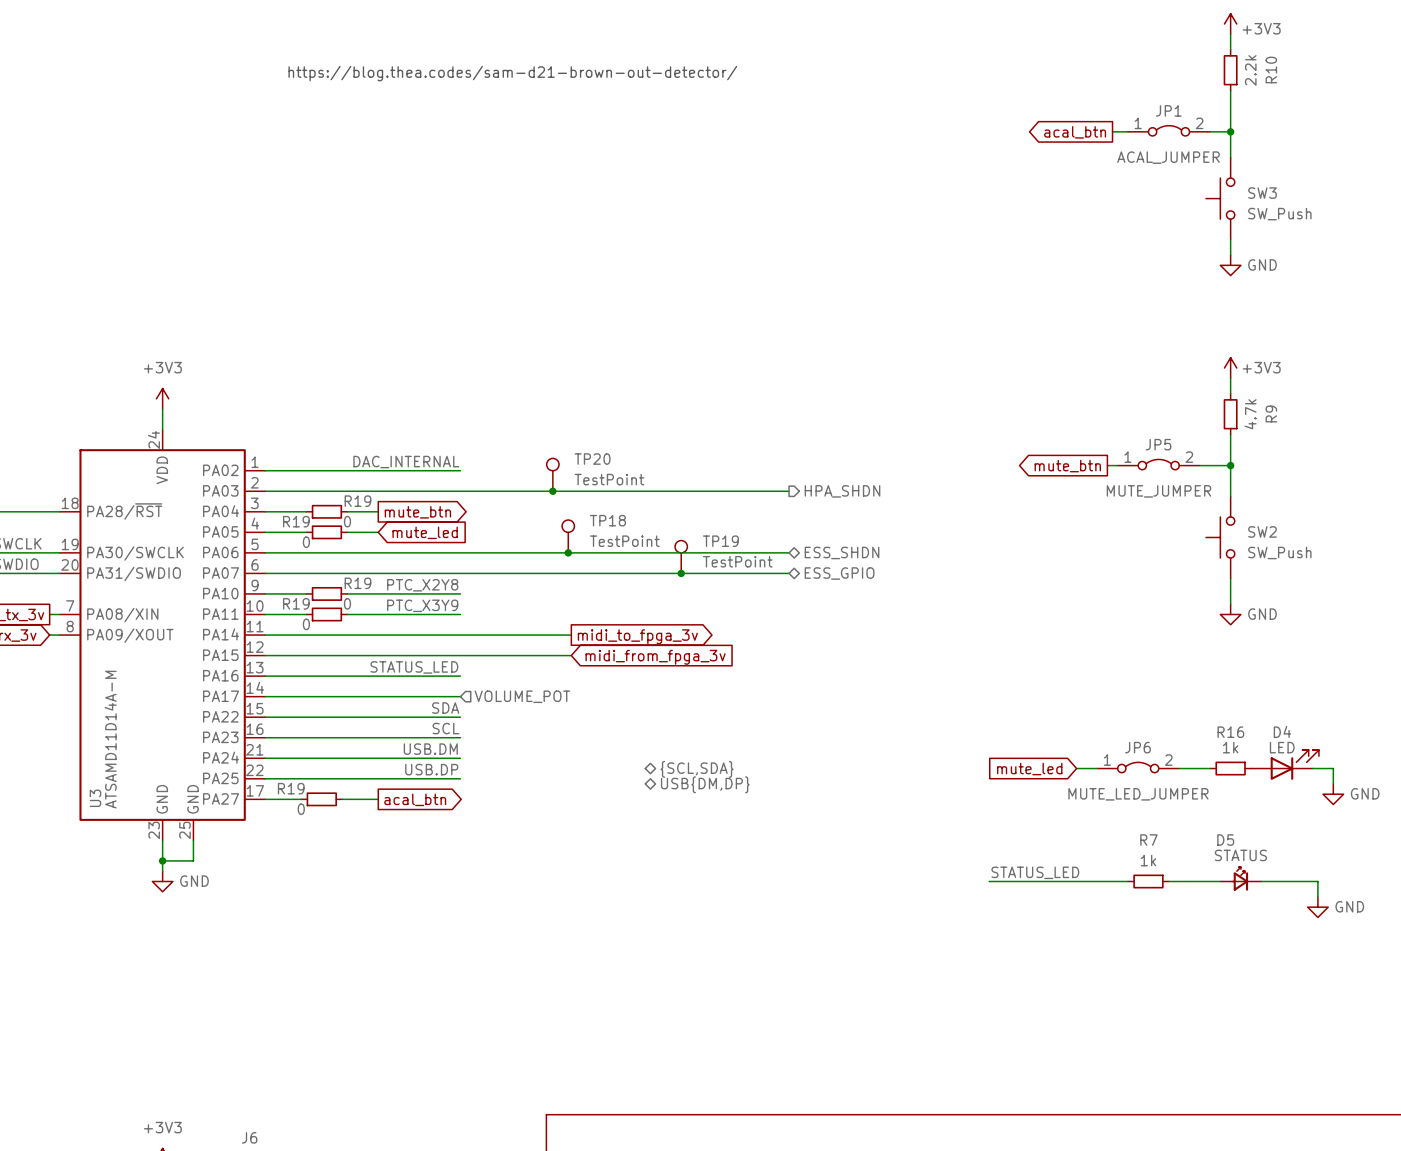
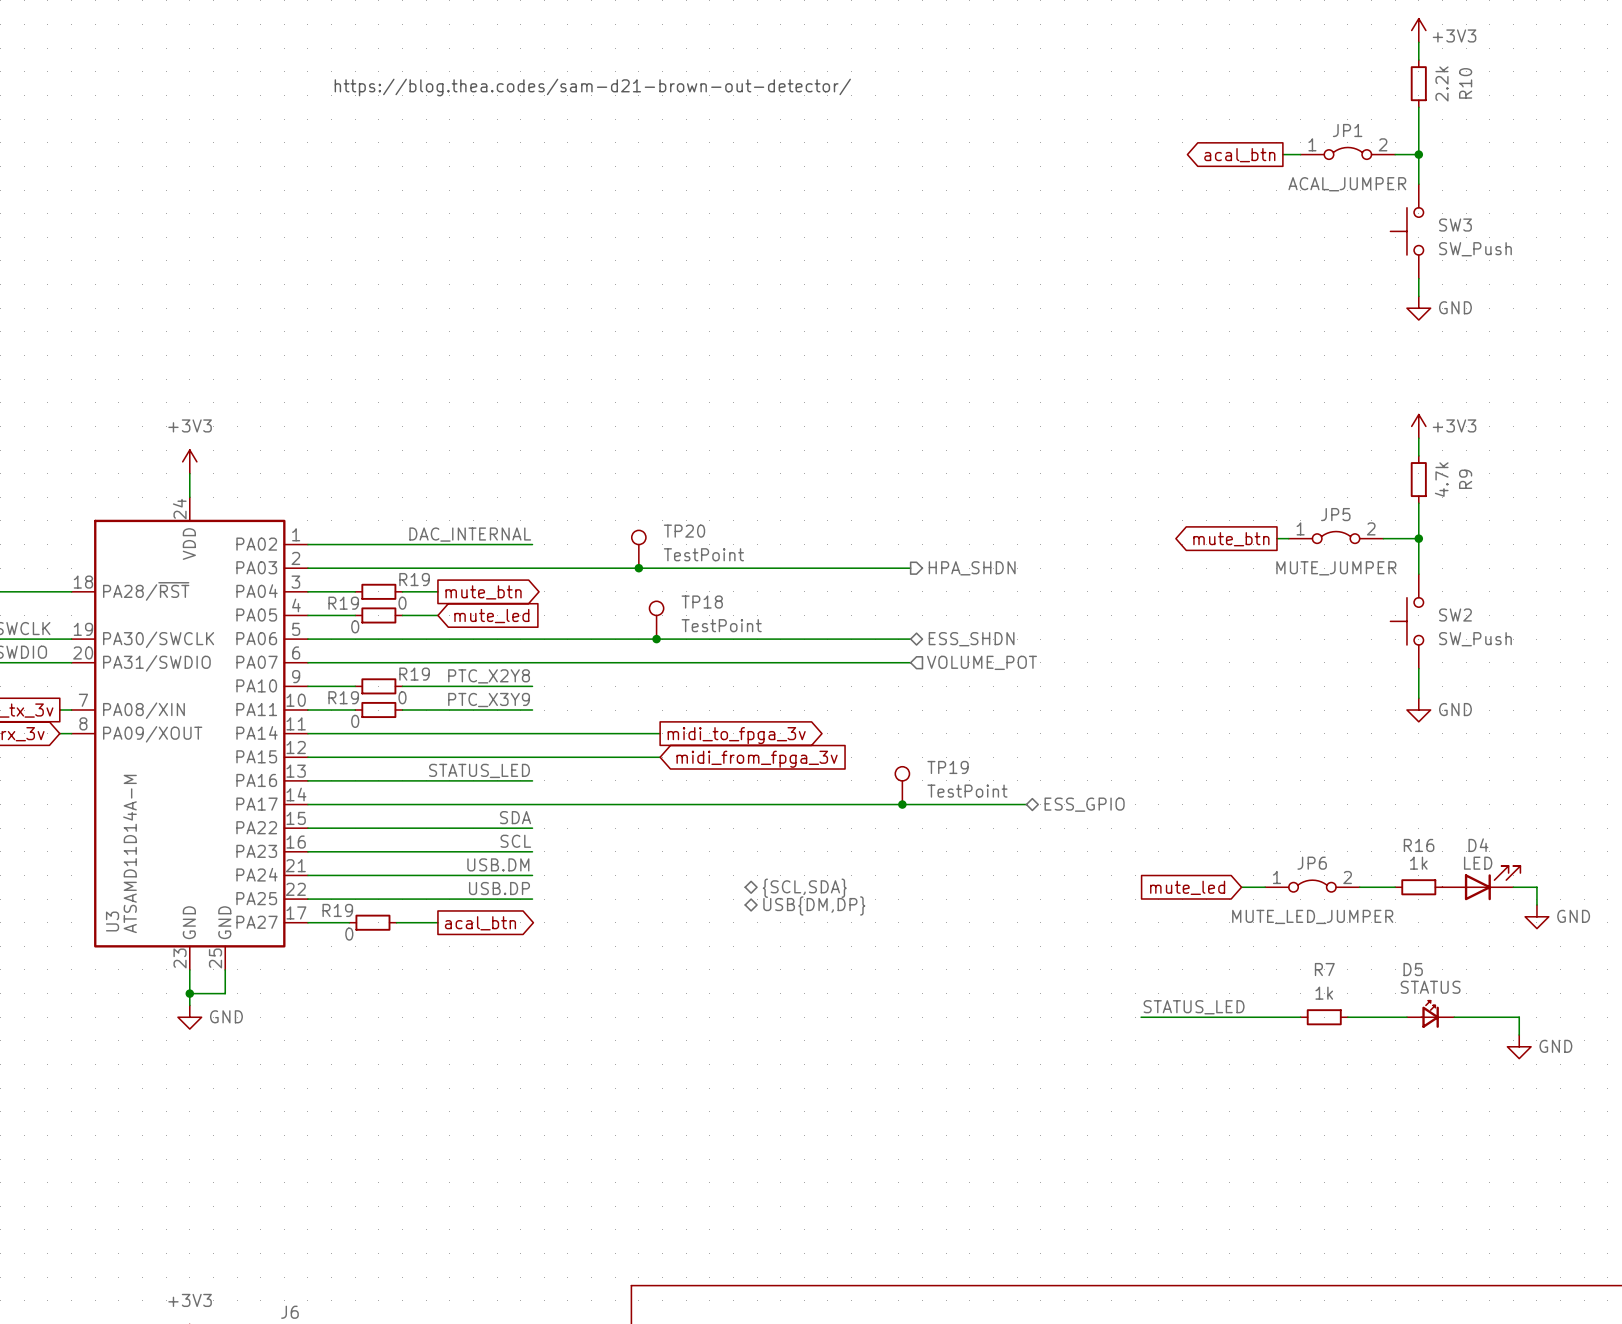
TP19 position: (681, 556) -> (902, 785)
junction: (681, 573) -> none
hierarchical label shape: bidirectional (839, 573) -> input (982, 662)
hierarchical label: ESS_GPIO (839, 573) -> VOLUME_POT (982, 662)
wire: none -> (532, 804) (1026, 804)
hierarchical label: VOLUME_POT (522, 696) -> none
junction: none -> (902, 804)
hierarchical label: none -> ESS_GPIO (1084, 804)

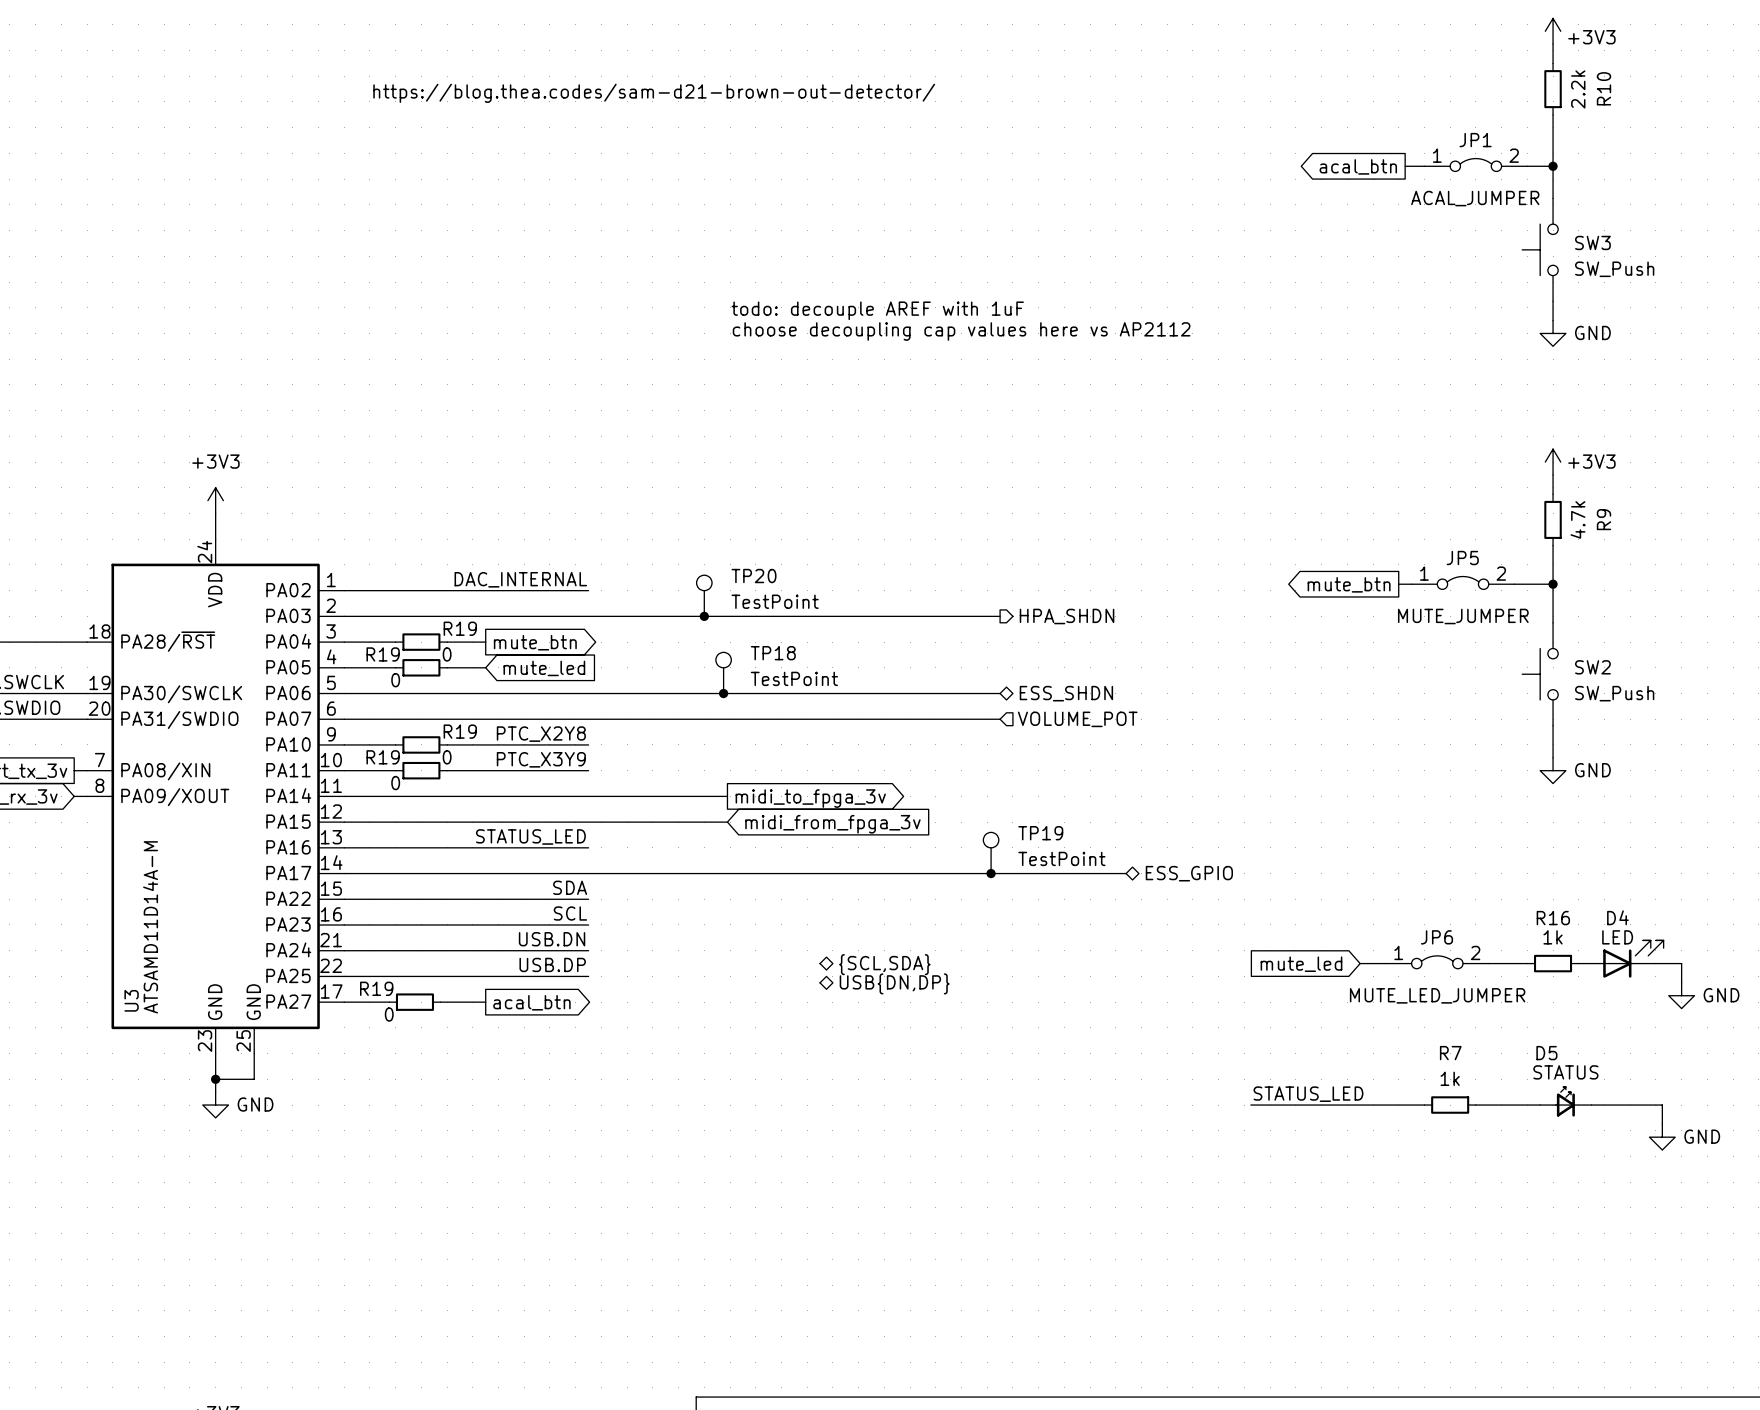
text: none -> todo: decouple AREF with 1uF (877, 310)
text: none -> choose decoupling cap values here vs AP2112 (961, 331)
label: USB.DM (498, 864) -> USB.DN (552, 939)
hierarchical label: USB{DM,DP} (814, 905) -> USB{DN,DP} (894, 983)

